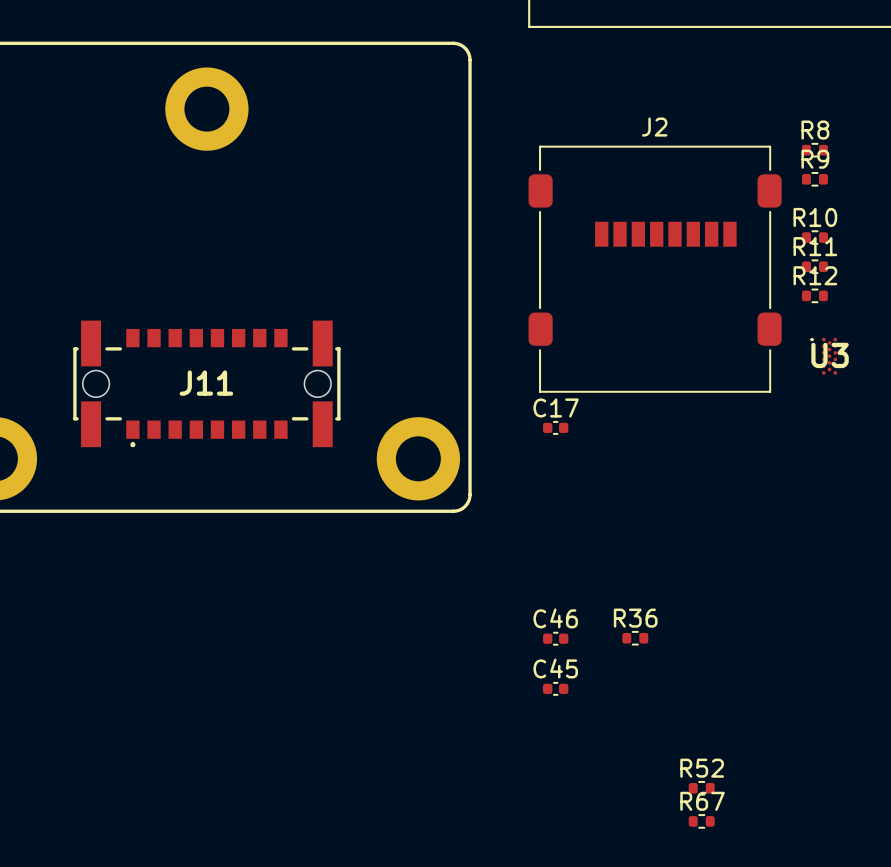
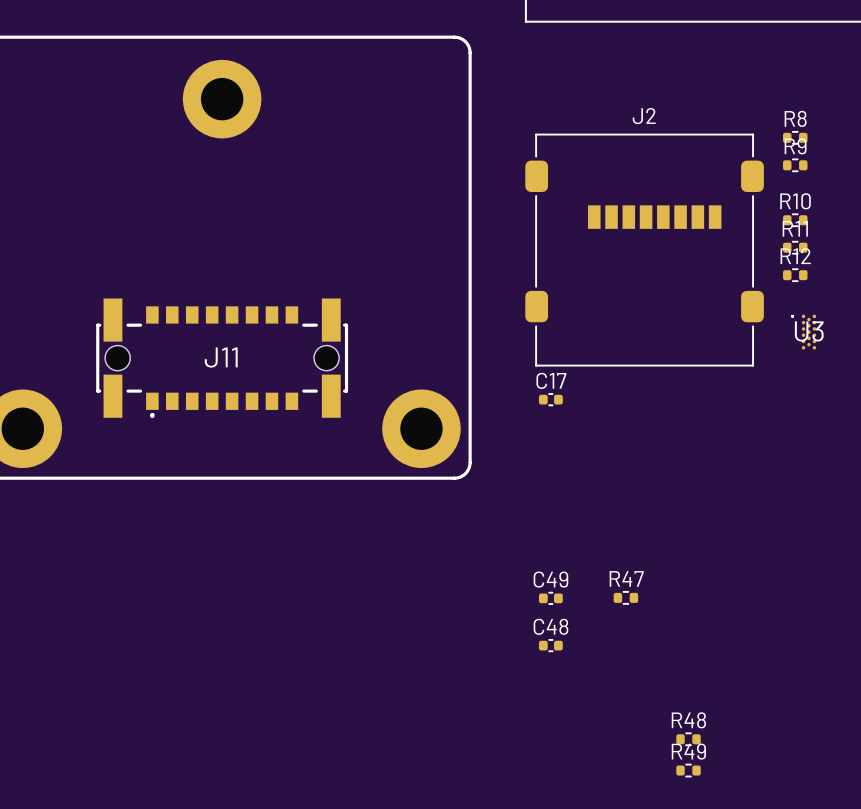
C46 name: C46 (555, 618) -> C49 (550, 579)
R36 name: R36 (635, 618) -> R47 (626, 578)
C45 name: C45 (555, 668) -> C48 (551, 626)
R52 name: R52 (702, 768) -> R48 (688, 720)
R67 name: R67 (702, 801) -> R49 (688, 751)

